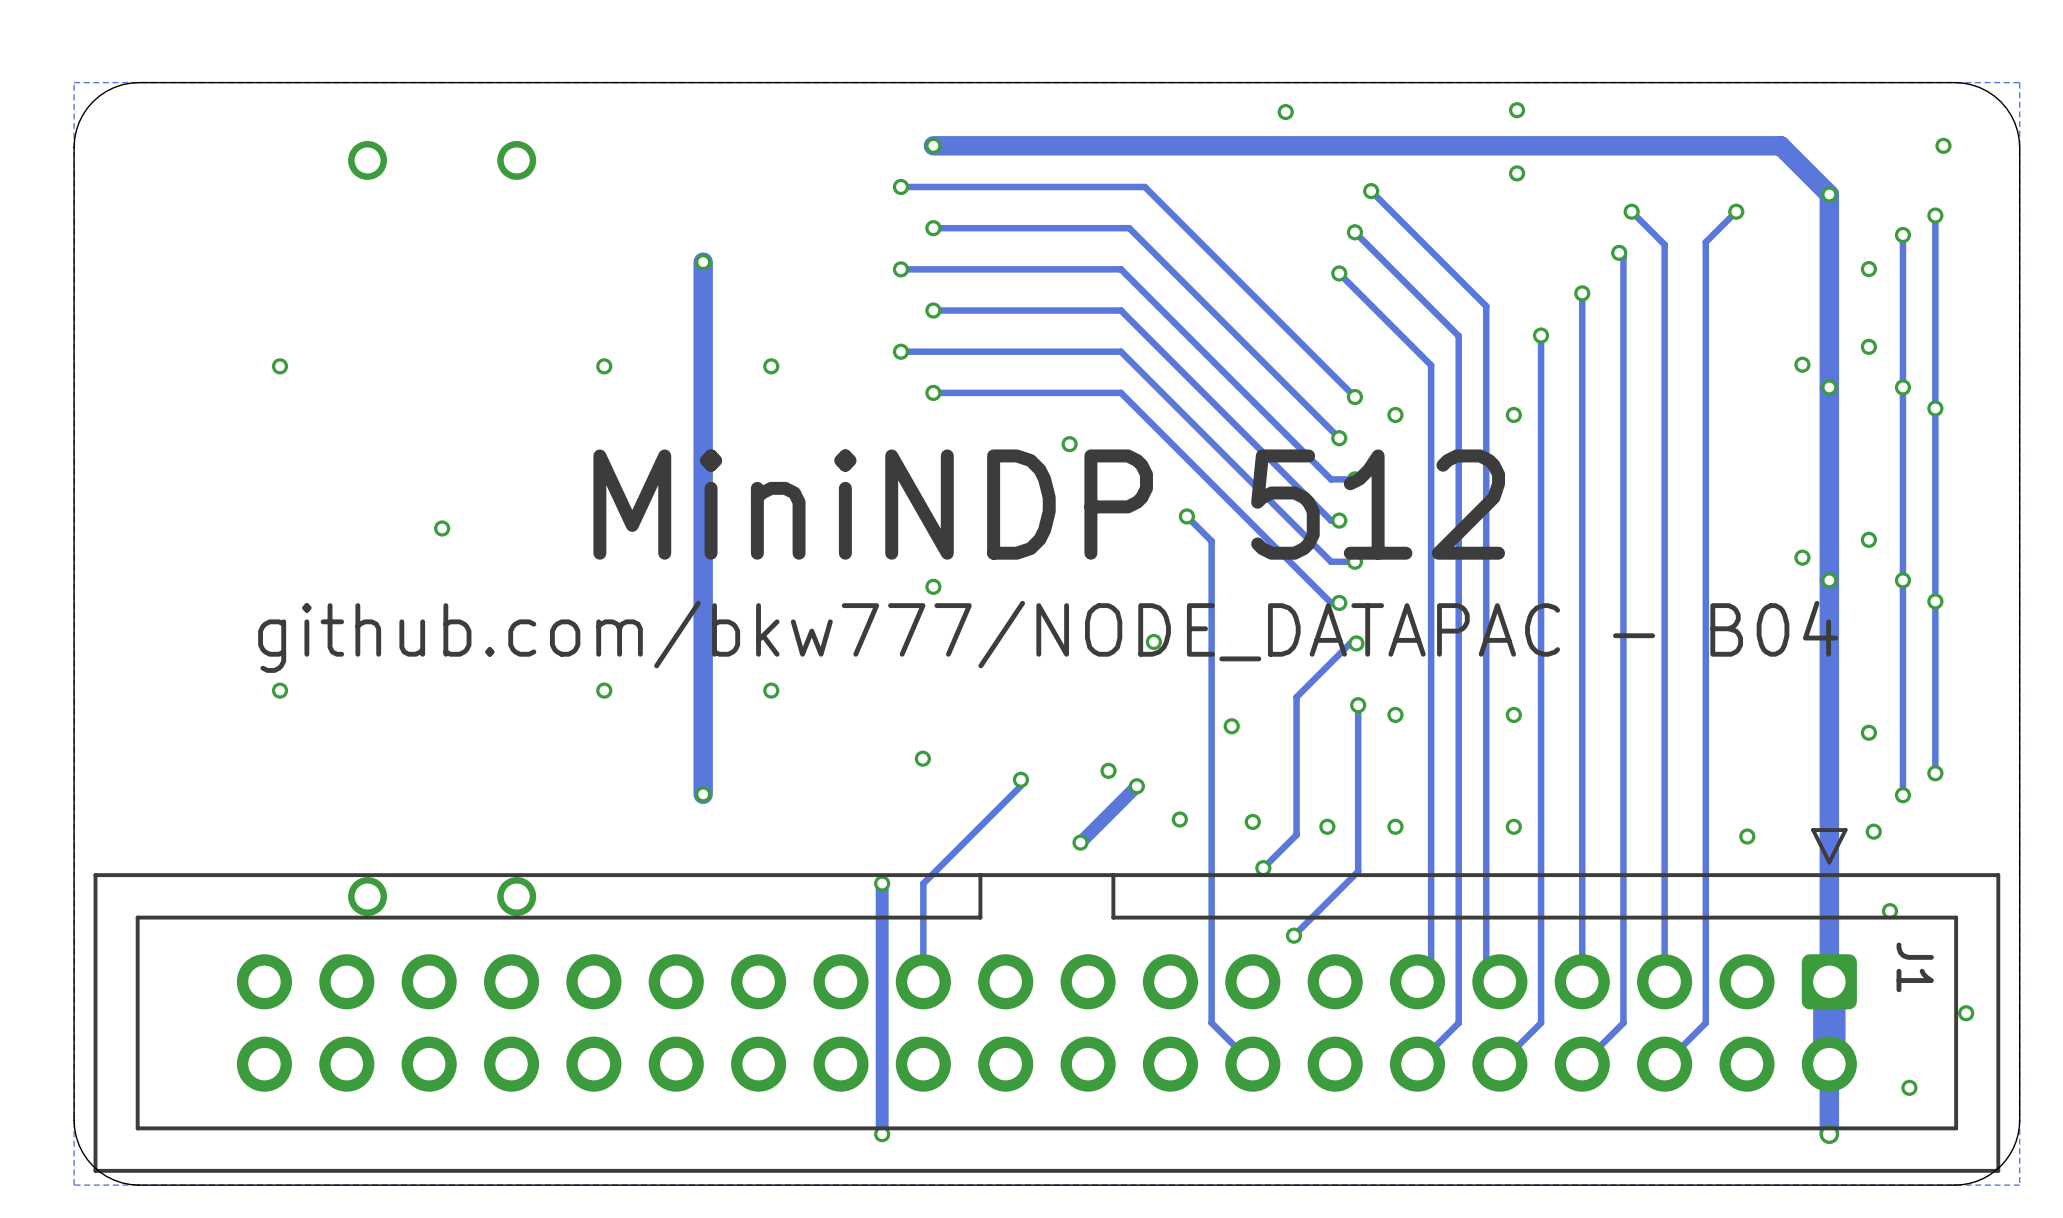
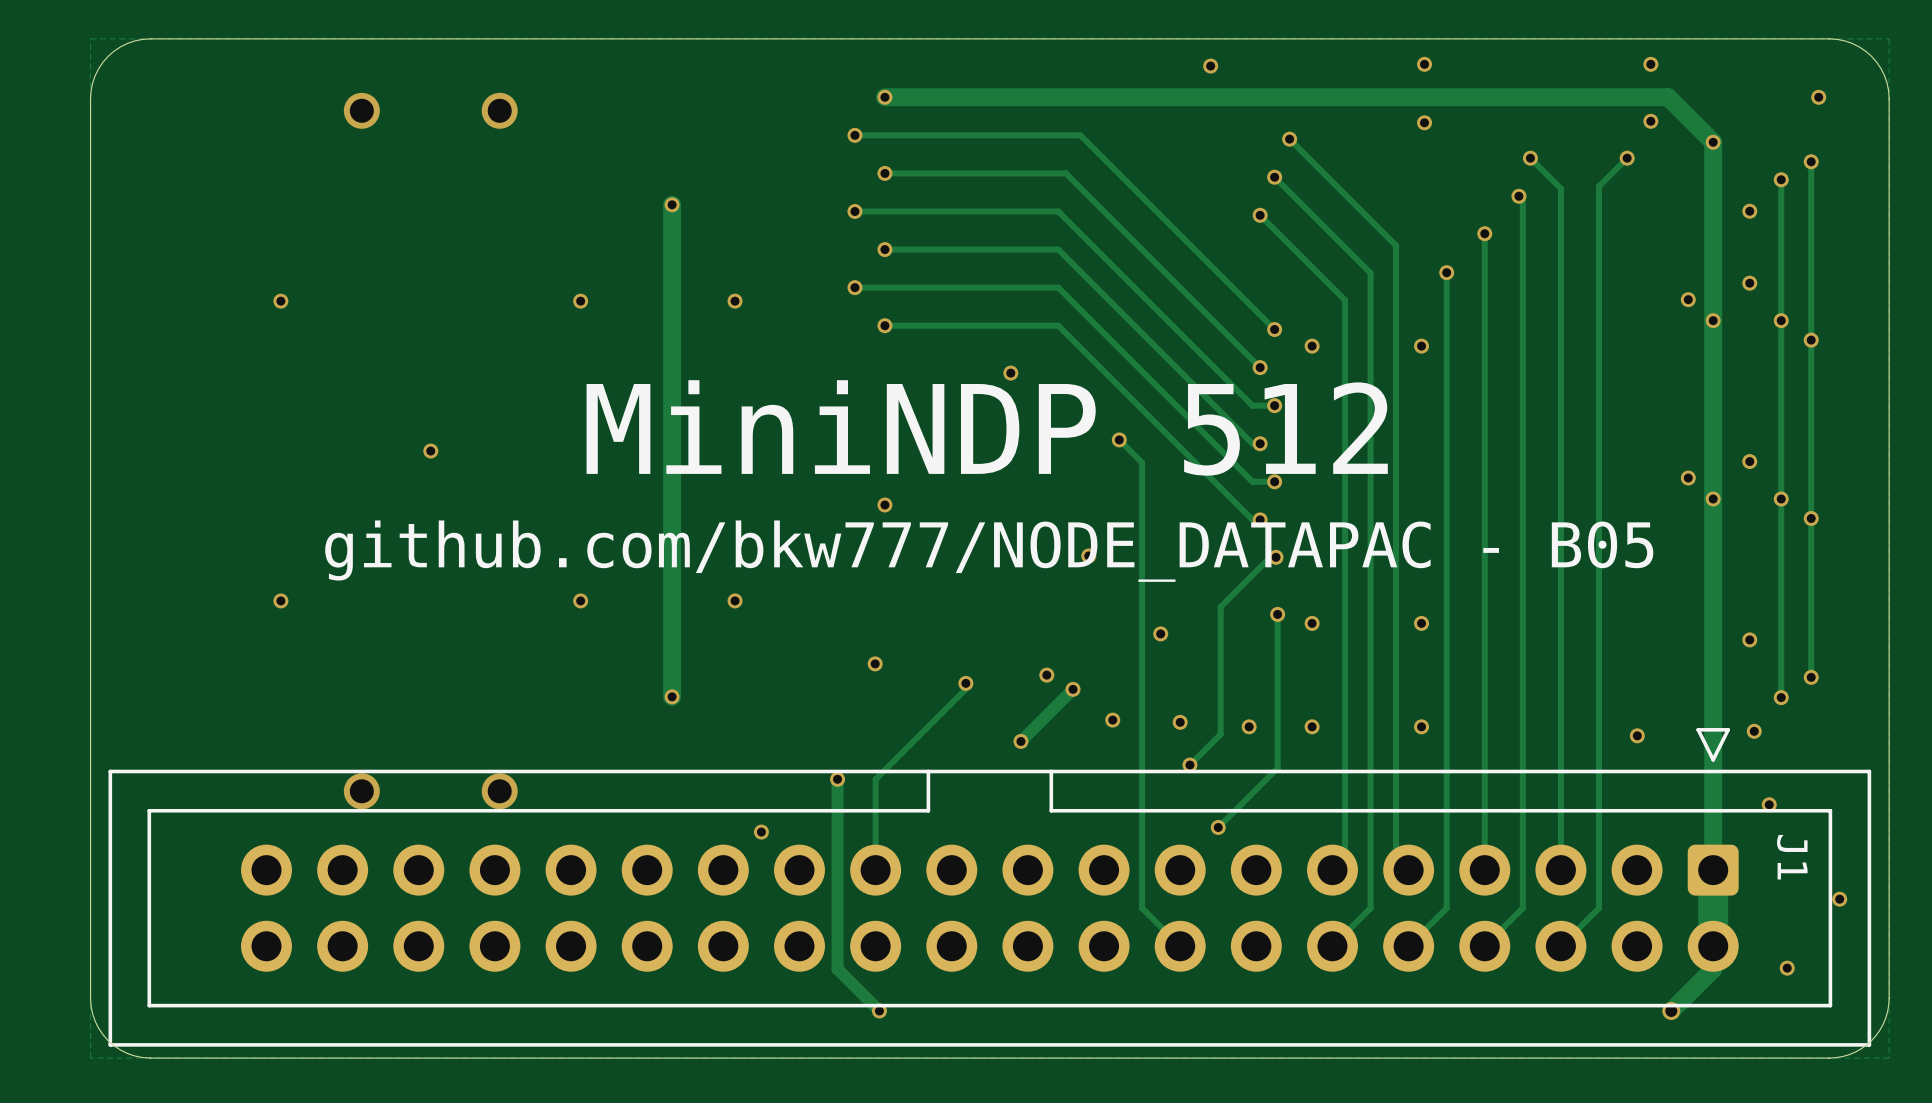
via: none -> (1650, 64)
via: none -> (1650, 121)
text: github.com/bkw777/NODE_DATAPAC - B04 (1048, 636) -> github.com/bkw777/NODE_DATAPAC - B05 (989, 551)
via: none -> (761, 832)
track: (882, 1088) (882, 1134) -> (837, 969) (879, 1010)
track: (1829, 1088) (1829, 1134) -> (1713, 969) (1671, 1010)
via position: (882, 1134) -> (879, 1010)
via position: (1829, 1134) -> (1671, 1010)

